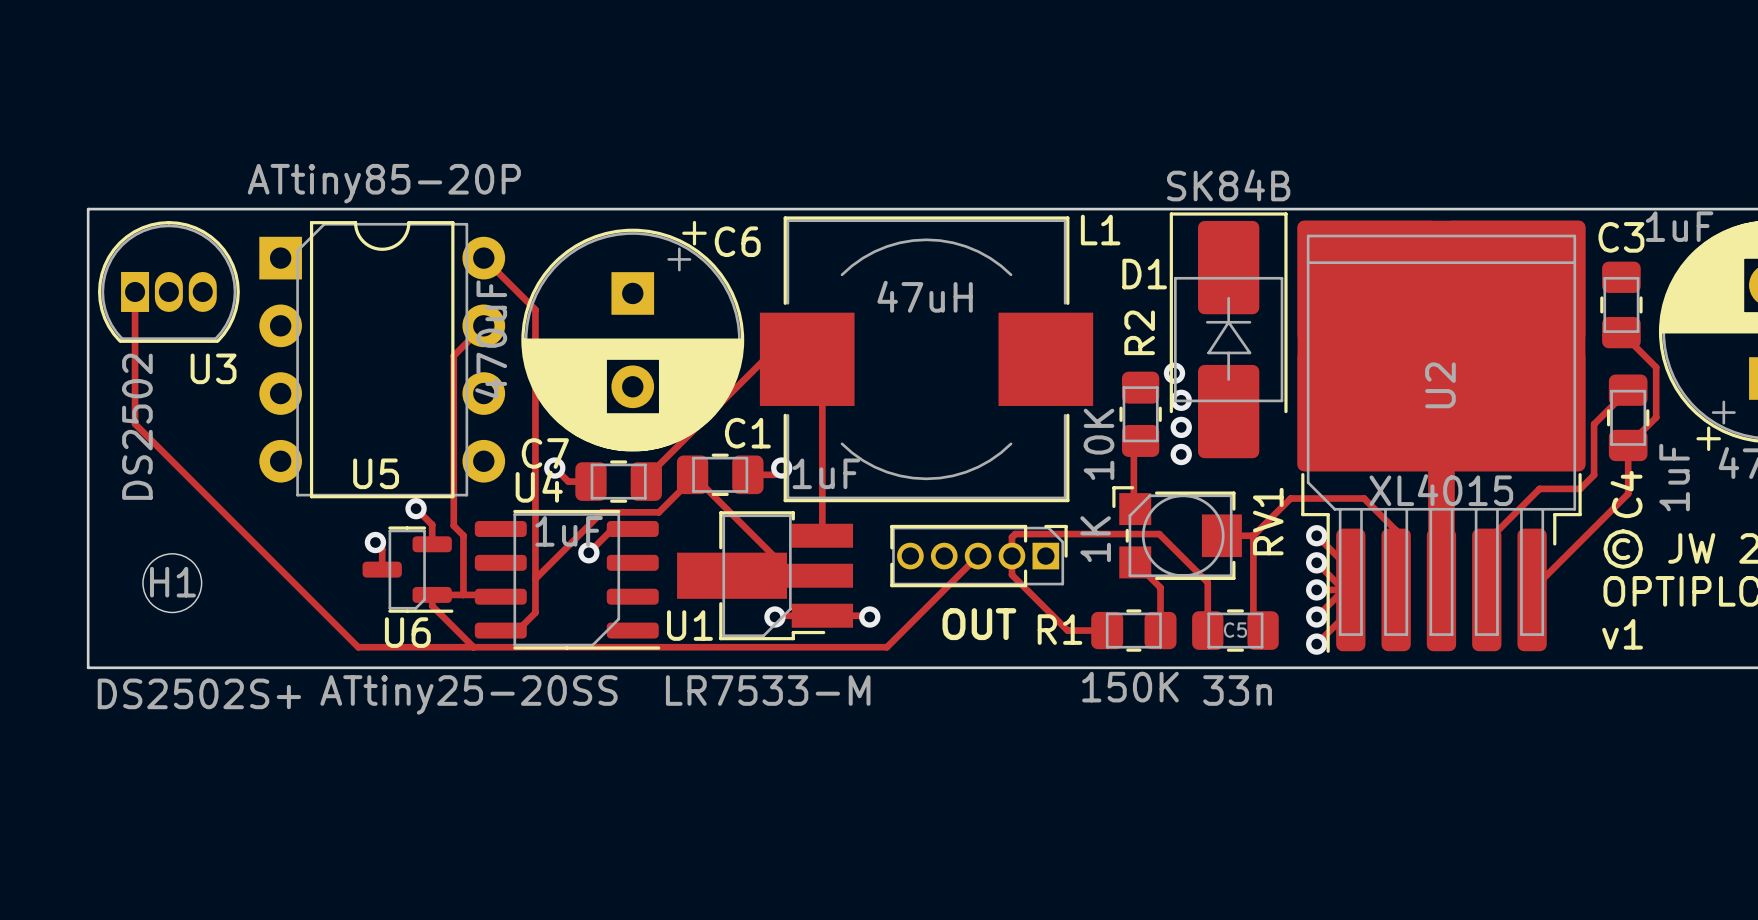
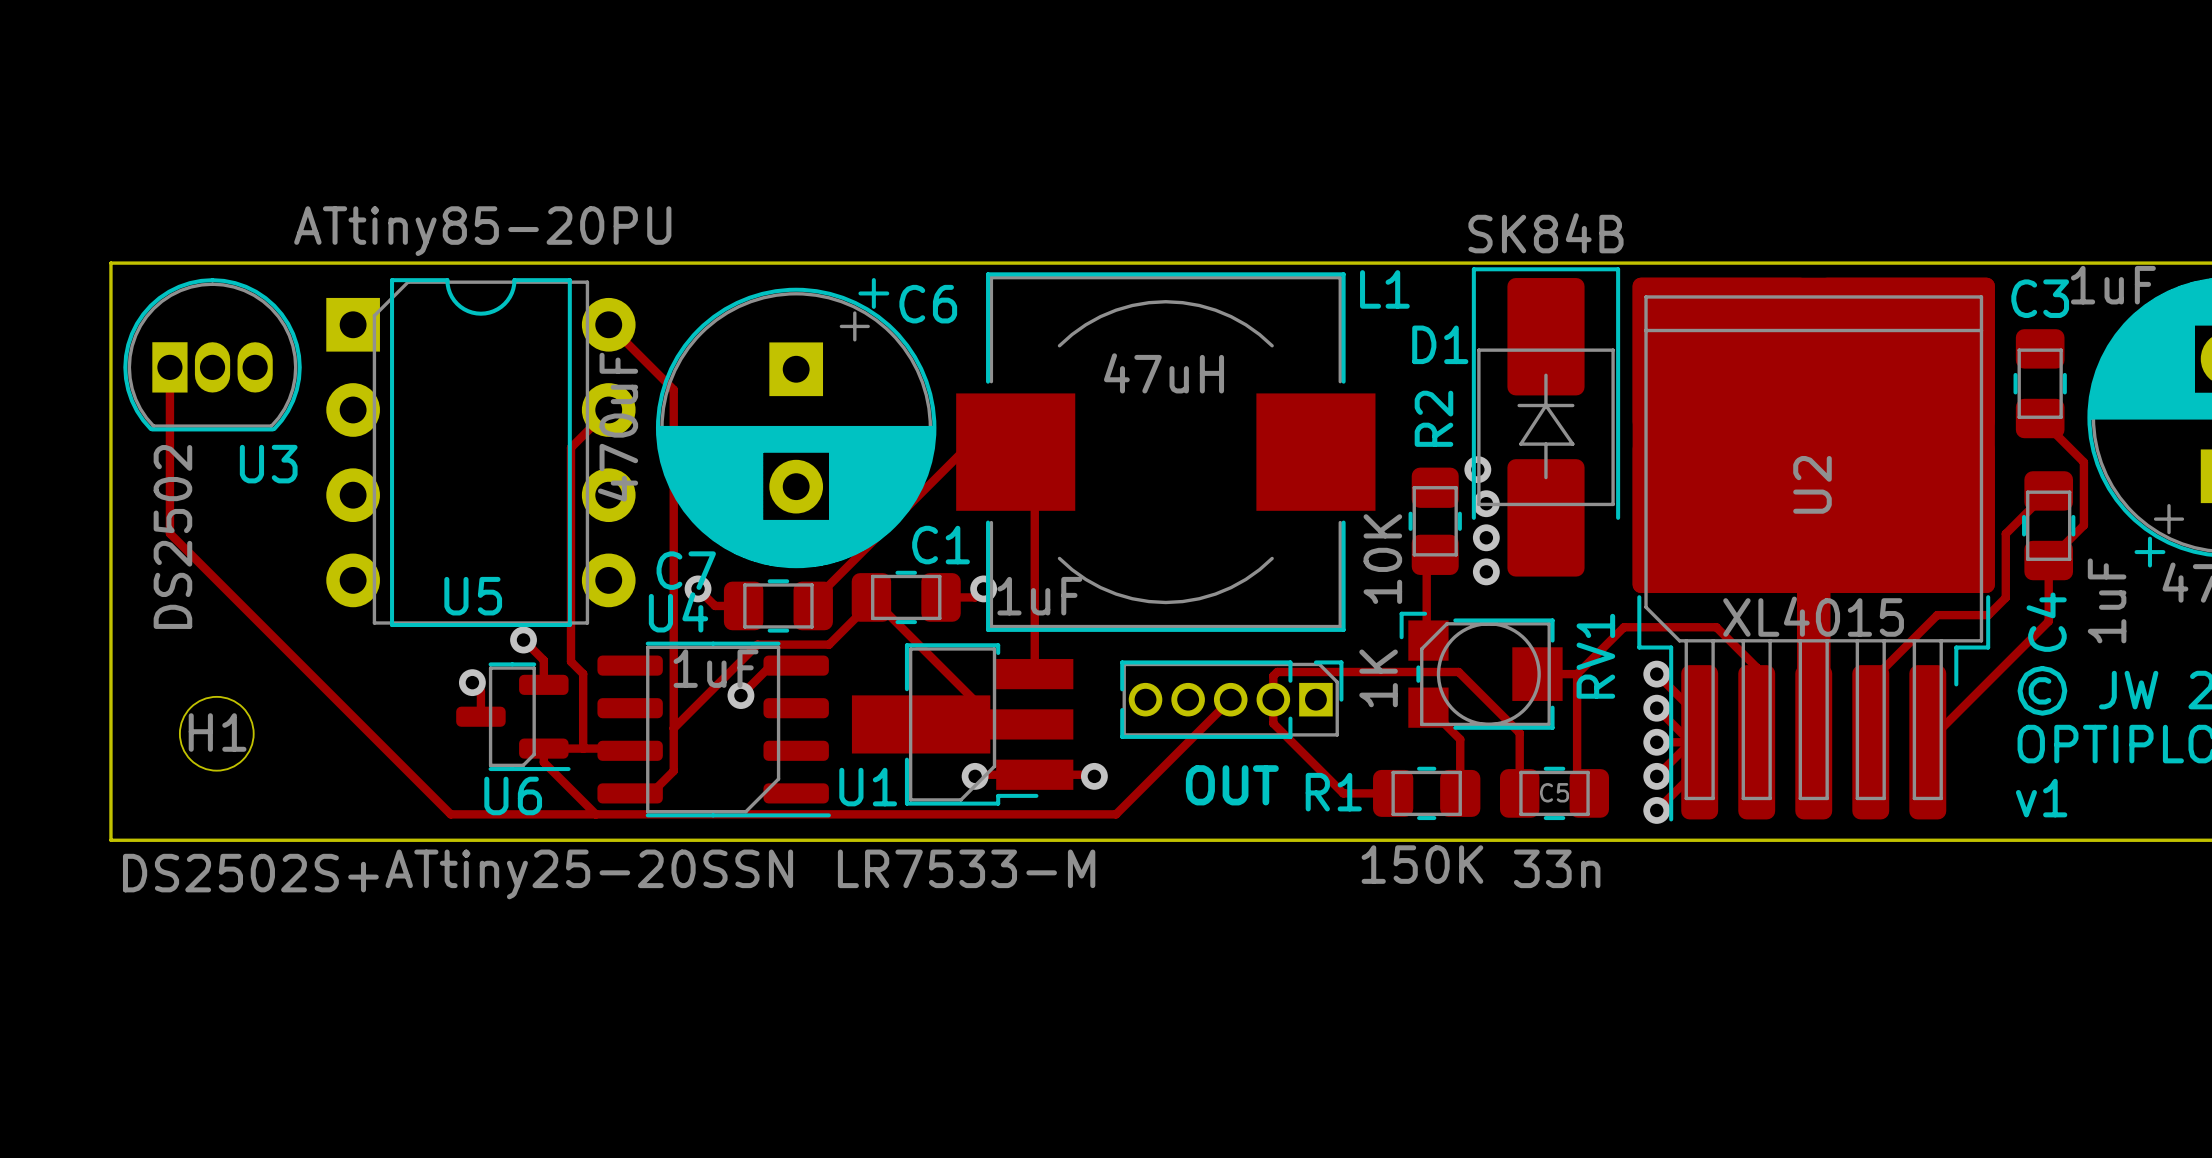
U5 value: ATtiny85-20P (384, 183) -> ATtiny85-20PU (482, 231)
U4 value: ATtiny25-20SS (468, 694) -> ATtiny25-20SSN (589, 874)

